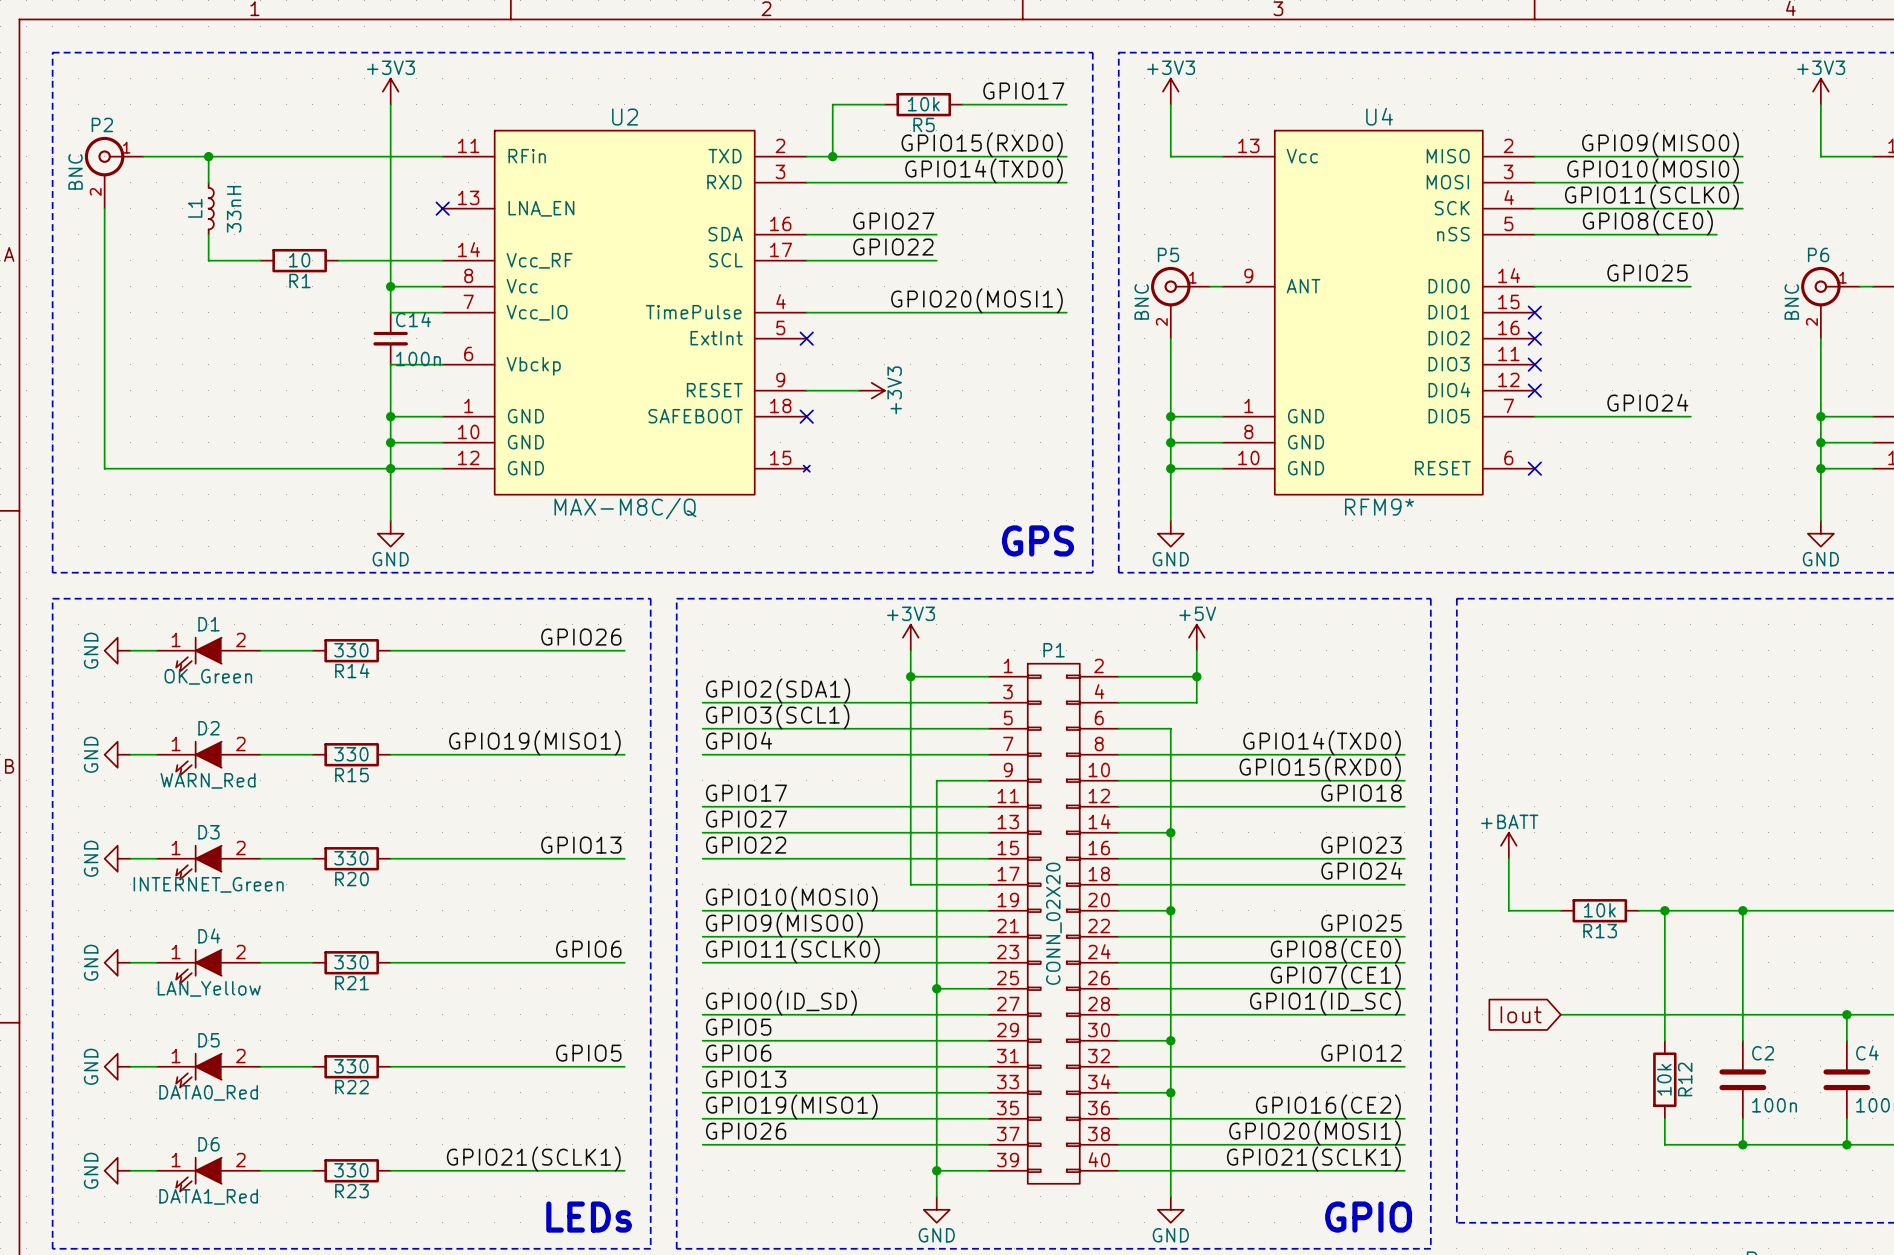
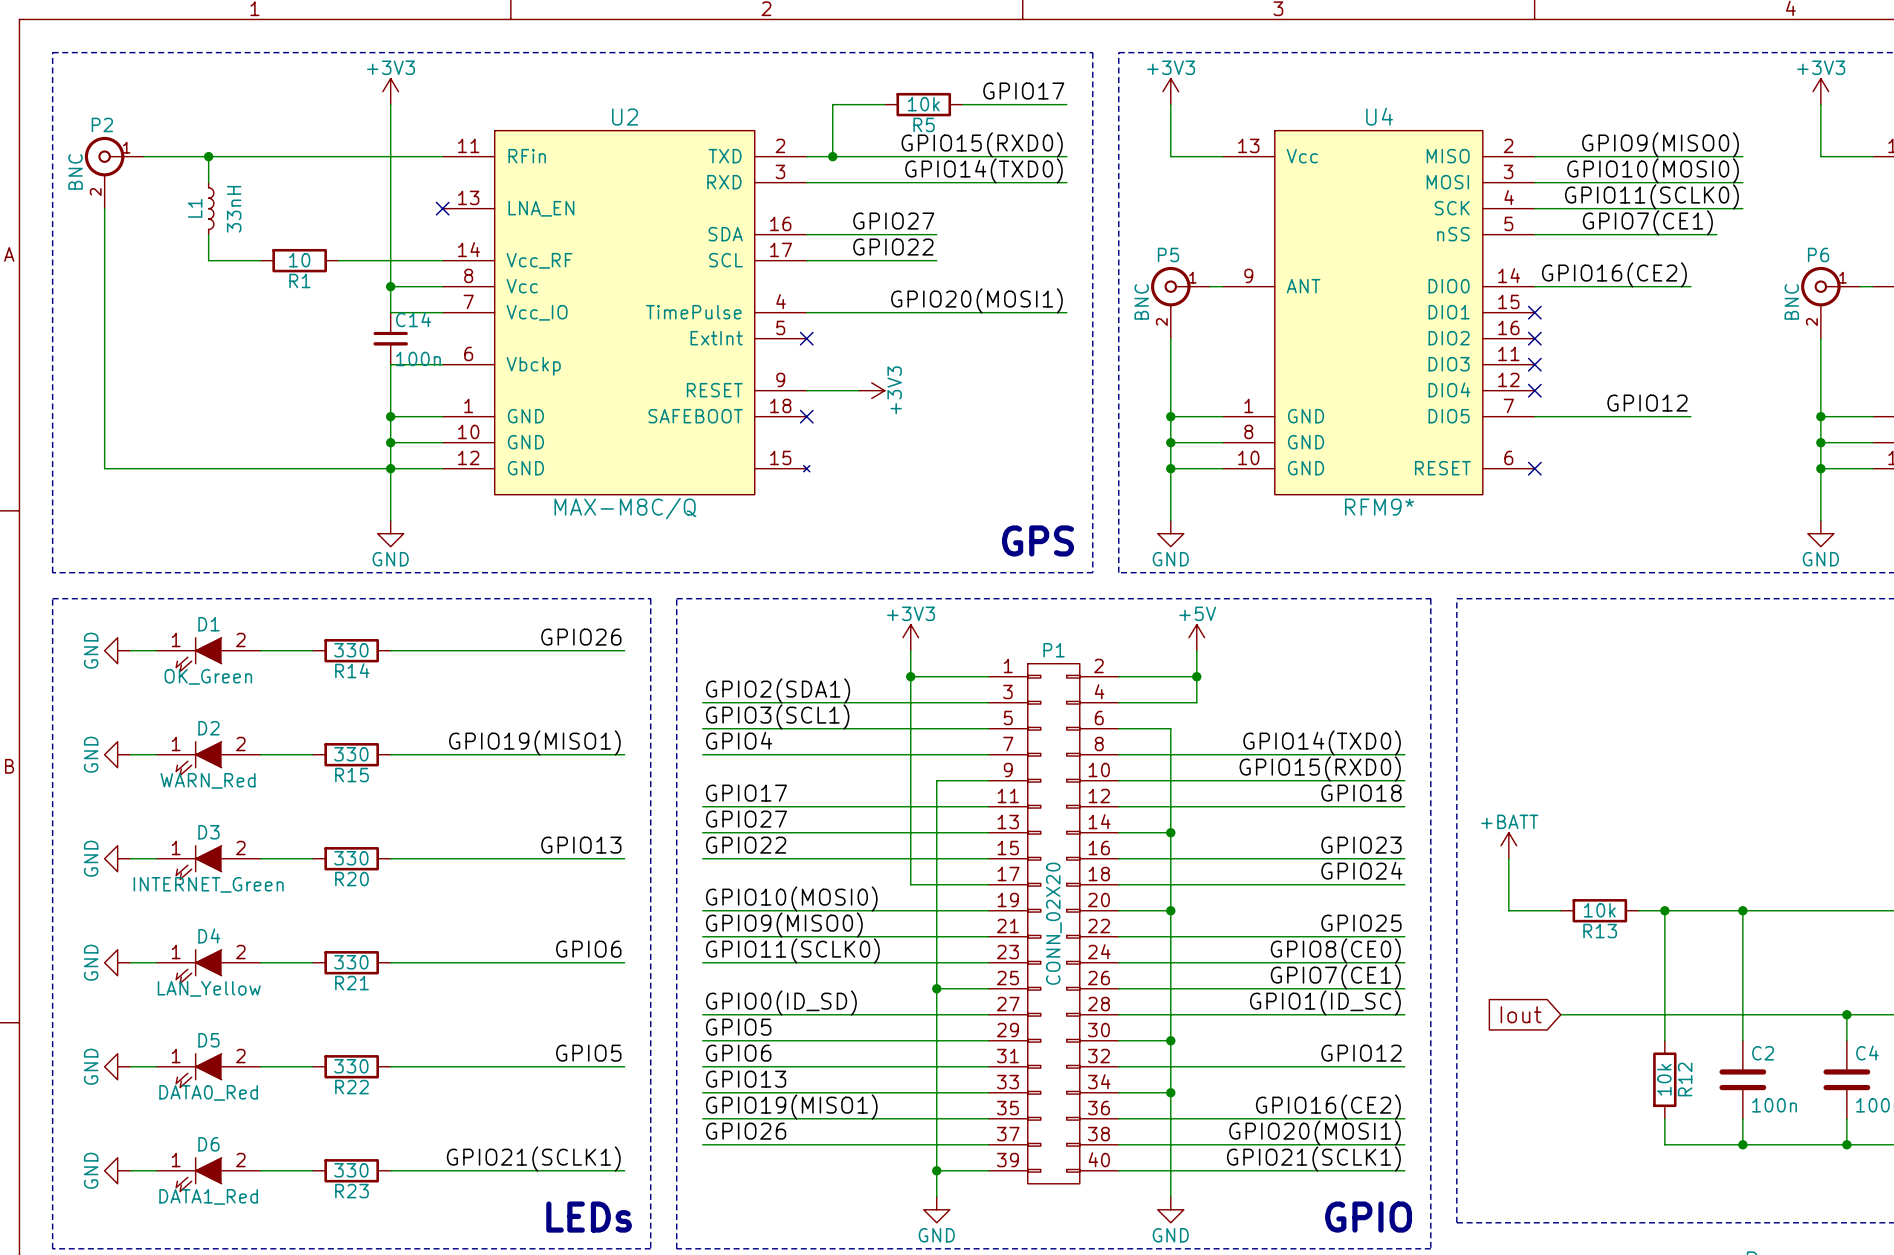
label: GPIO8(CE0) (1647, 222) -> GPIO7(CE1) (1647, 222)
label: GPIO25 (1647, 273) -> GPIO16(CE2) (1614, 274)
label: GPIO24 (1647, 402) -> GPIO12 (1647, 403)

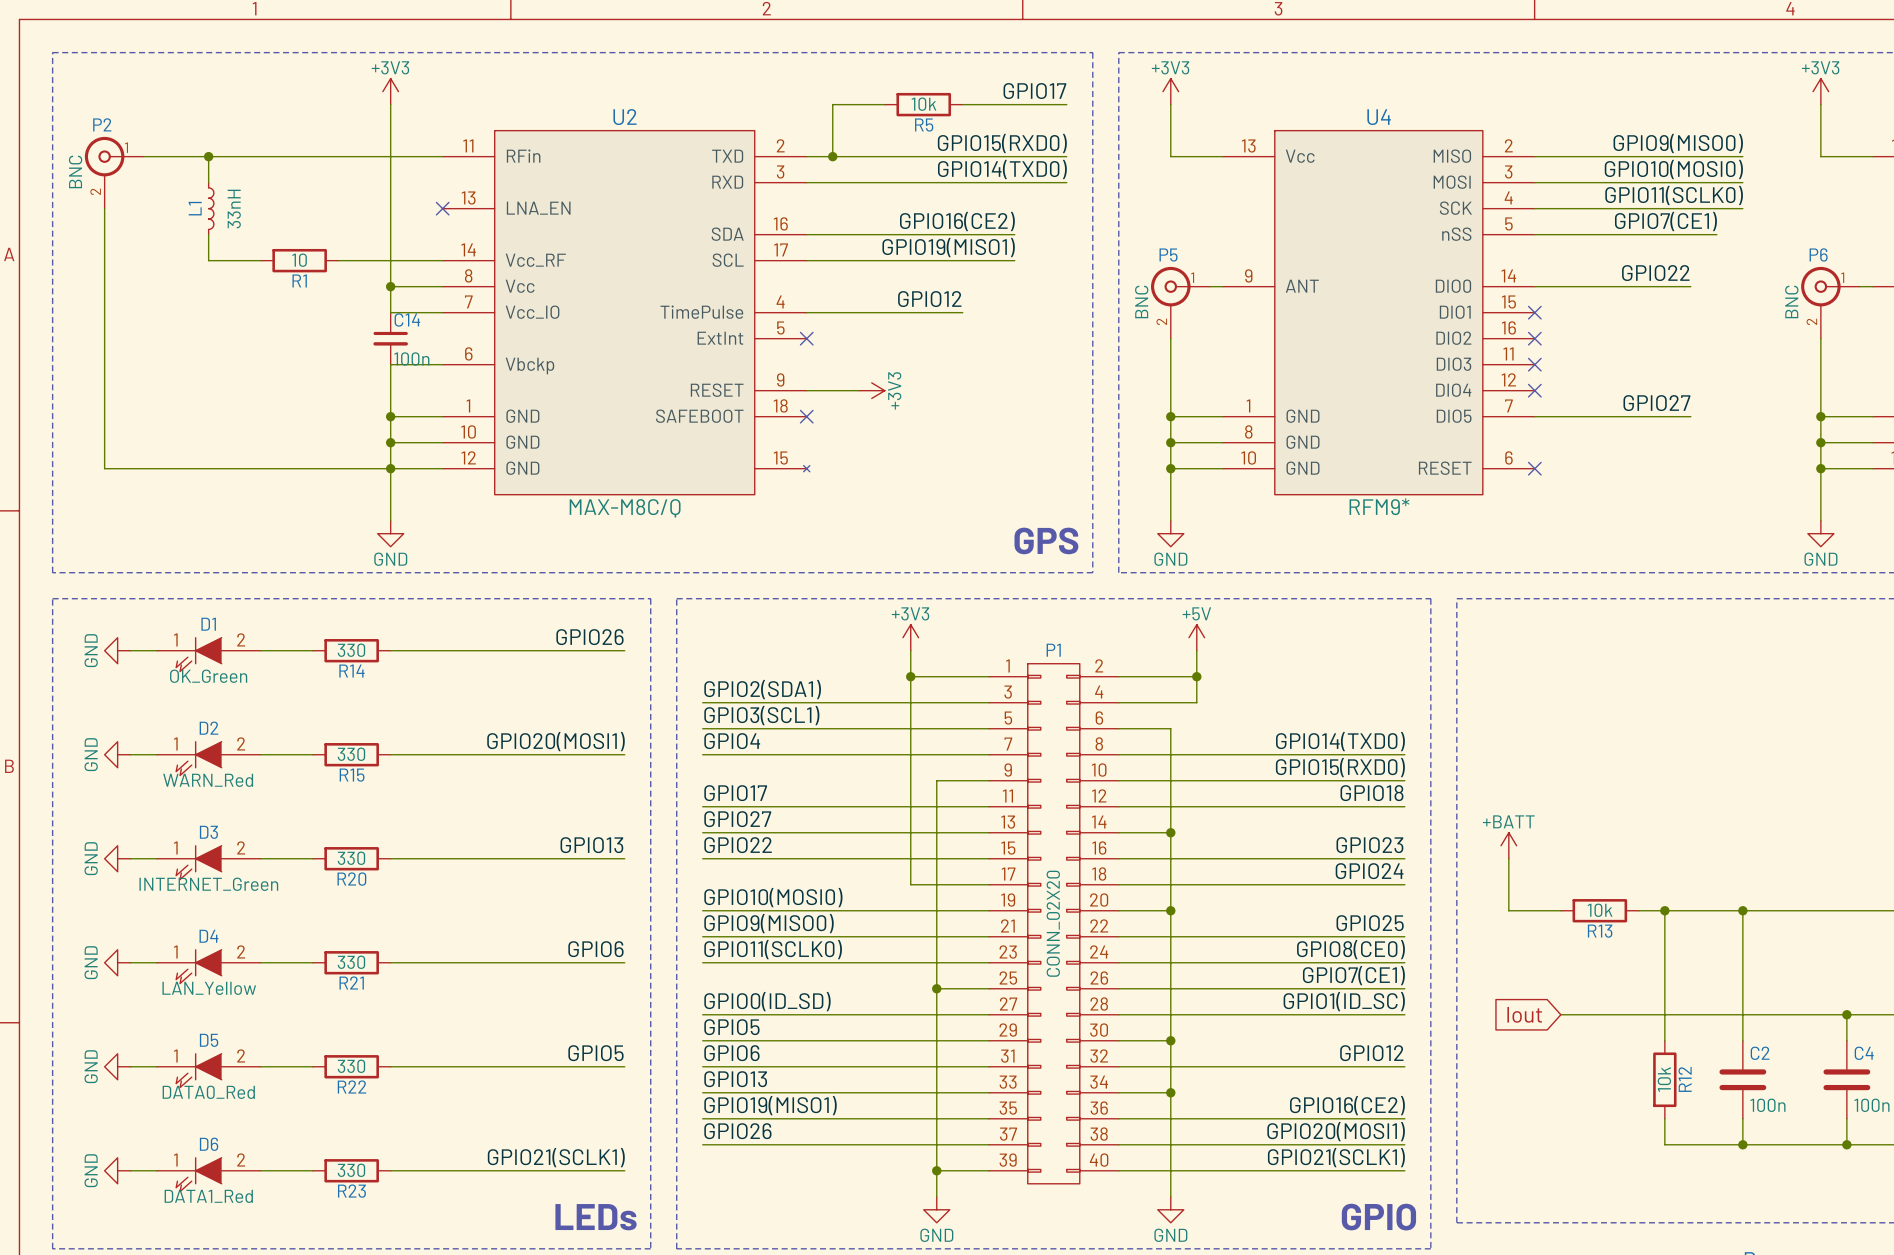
label: GPIO27 (893, 221) -> none
label: none -> GPIO16(CE2) (957, 221)
wire: none -> (936, 234) (1014, 234)
label: GPIO22 (893, 247) -> none
label: none -> GPIO19(MISO1) (948, 247)
wire: none -> (936, 260) (1014, 260)
label: GPIO16(CE2) (1614, 274) -> GPIO22 (1655, 273)
label: none -> GPIO12 (929, 299)
label: GPIO20(MOSI1) (976, 300) -> none
wire: (962, 312) (1066, 312) -> none
label: GPIO12 (1647, 403) -> GPIO27 (1656, 403)
label: GPIO19(MISO1) (534, 742) -> GPIO20(MOSI1) (556, 741)

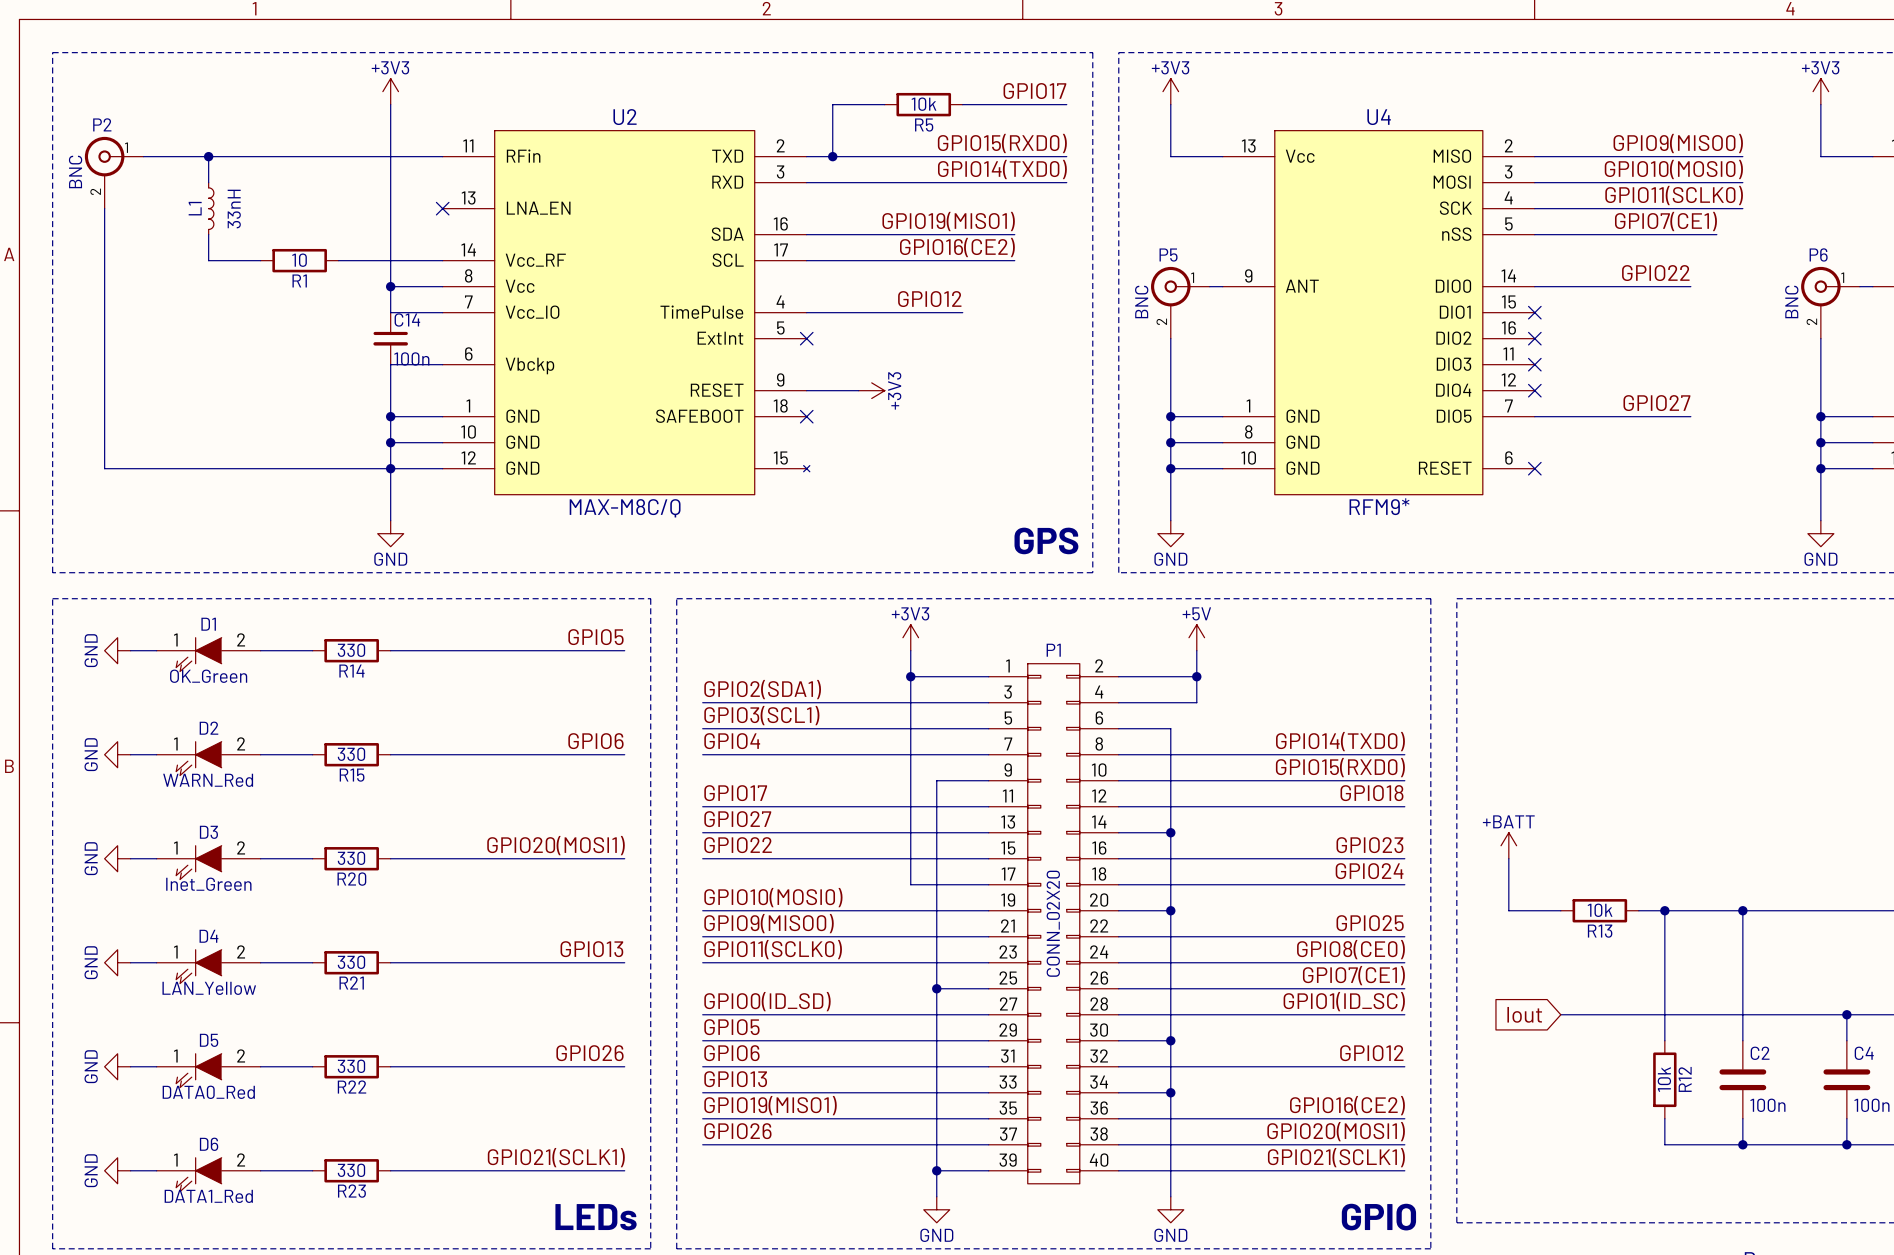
label: GPIO16(CE2) (957, 221) -> GPIO19(MISO1) (948, 221)
label: GPIO19(MISO1) (948, 247) -> GPIO16(CE2) (957, 247)
label: GPIO26 (589, 637) -> GPIO5 (595, 637)
label: GPIO20(MOSI1) (556, 741) -> GPIO6 (595, 741)
label: GPIO13 (591, 845) -> GPIO20(MOSI1) (556, 845)
D3 value: INTERNET_Green (208, 884) -> Inet_Green (208, 884)
label: GPIO6 (595, 949) -> GPIO13 (591, 949)
label: GPIO5 (595, 1053) -> GPIO26 (589, 1053)

